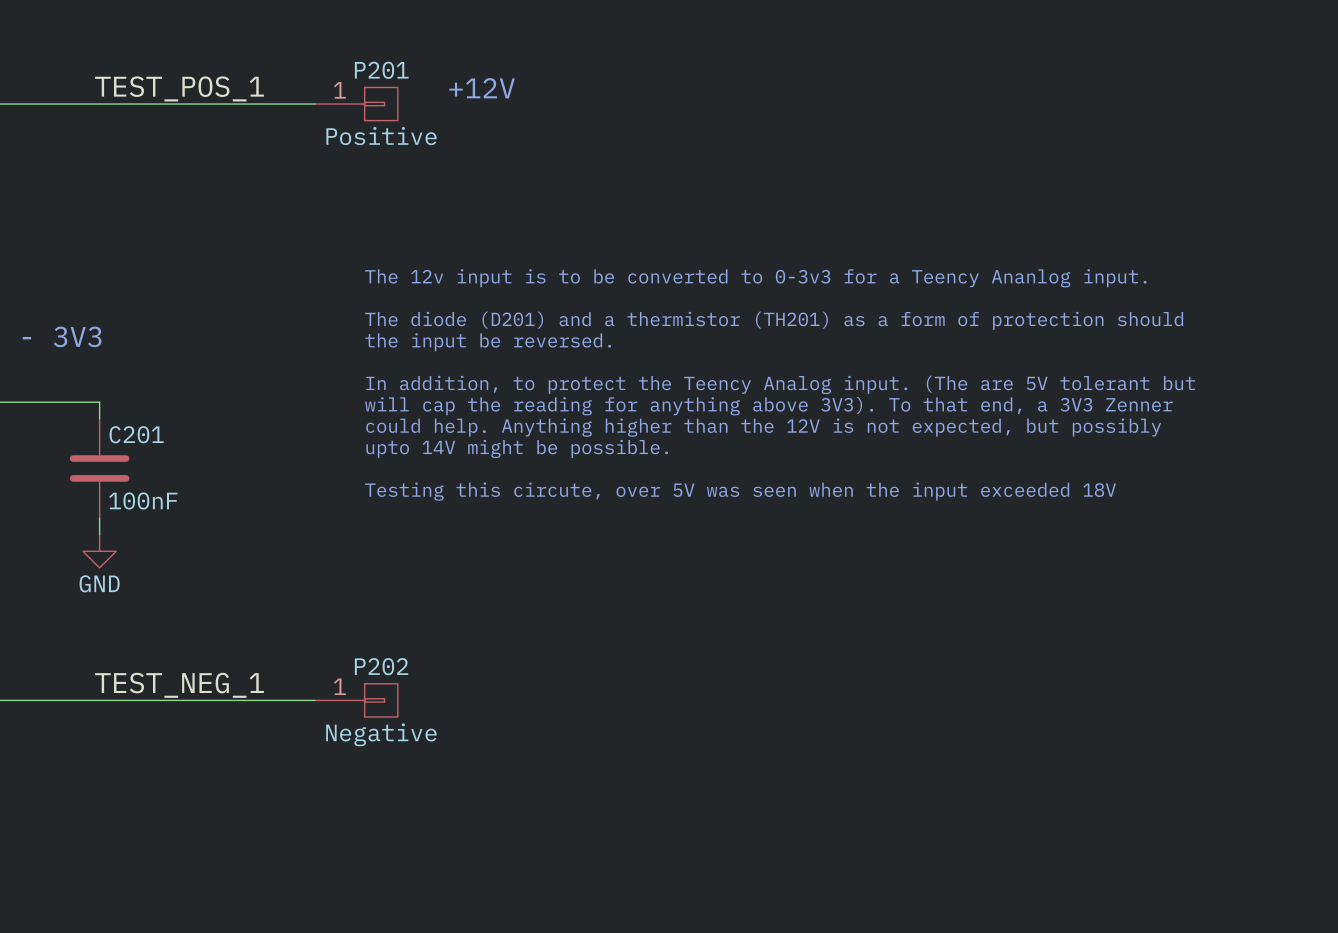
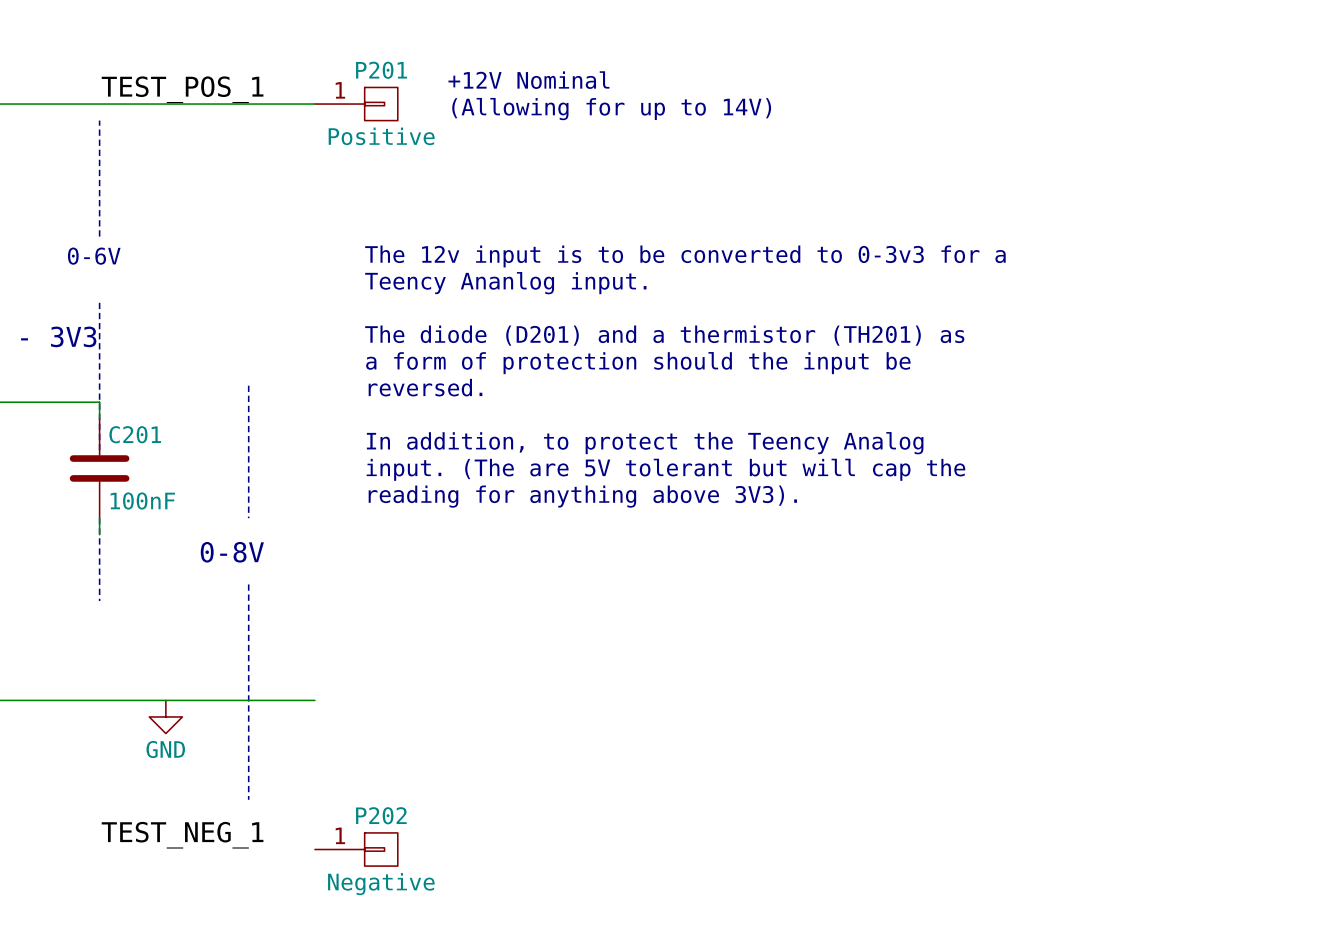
text: none -> +12V Nominal (528, 80)
text: +12V (482, 88) -> none
text: none -> (Allowing for up to 14V) (611, 109)
line: none -> (99, 120) (99, 236)
text: none -> 0-6V (94, 256)
text: none -> The 12v input is to be converted to 0-3v3 for a (685, 256)
text: The 12v input is to be converted to 0-3v3 for a Teency Ananlog input. (755, 278) -> Teency Ananlog input. (505, 283)
line: none -> (99, 302) (99, 451)
text: The diode (D201) and a thermistor (TH201) as a form of protection should (774, 320) -> none
text: the input be reversed. (488, 342) -> The diode (D201) and a thermistor (TH201) as (664, 335)
text: none -> a form of protection should the input be (638, 363)
text: In addition, to protect the Teency Analog input. (The are 5V tolerant but (780, 384) -> reversed. (425, 387)
line: none -> (248, 385) (248, 518)
text: will cap the reading for anything above 3V3). To that end, a 3V3 Zenner (769, 406) -> none
text: could help. Anything higher than the 12V is not expected, but possibly (763, 427) -> none
text: upto 14V might be possible. (517, 448) -> In addition, to protect the Teency Analog (645, 443)
text: none -> input. (The are 5V tolerant but will cap the (665, 469)
text: Testing this circute, over 5V was seen when the input exceeded 18V (740, 491) -> reading for anything above 3V3). (582, 496)
line: none -> (99, 518) (99, 601)
power symbol: GND (99, 551) -> none
text: none -> 0-8V (232, 552)
line: none -> (248, 584) (248, 799)
label position: TEST_NEG_1 (179, 685) -> TEST_NEG_1 (182, 835)
P202 position: (356, 700) -> (356, 849)
power symbol: none -> GND (165, 716)

